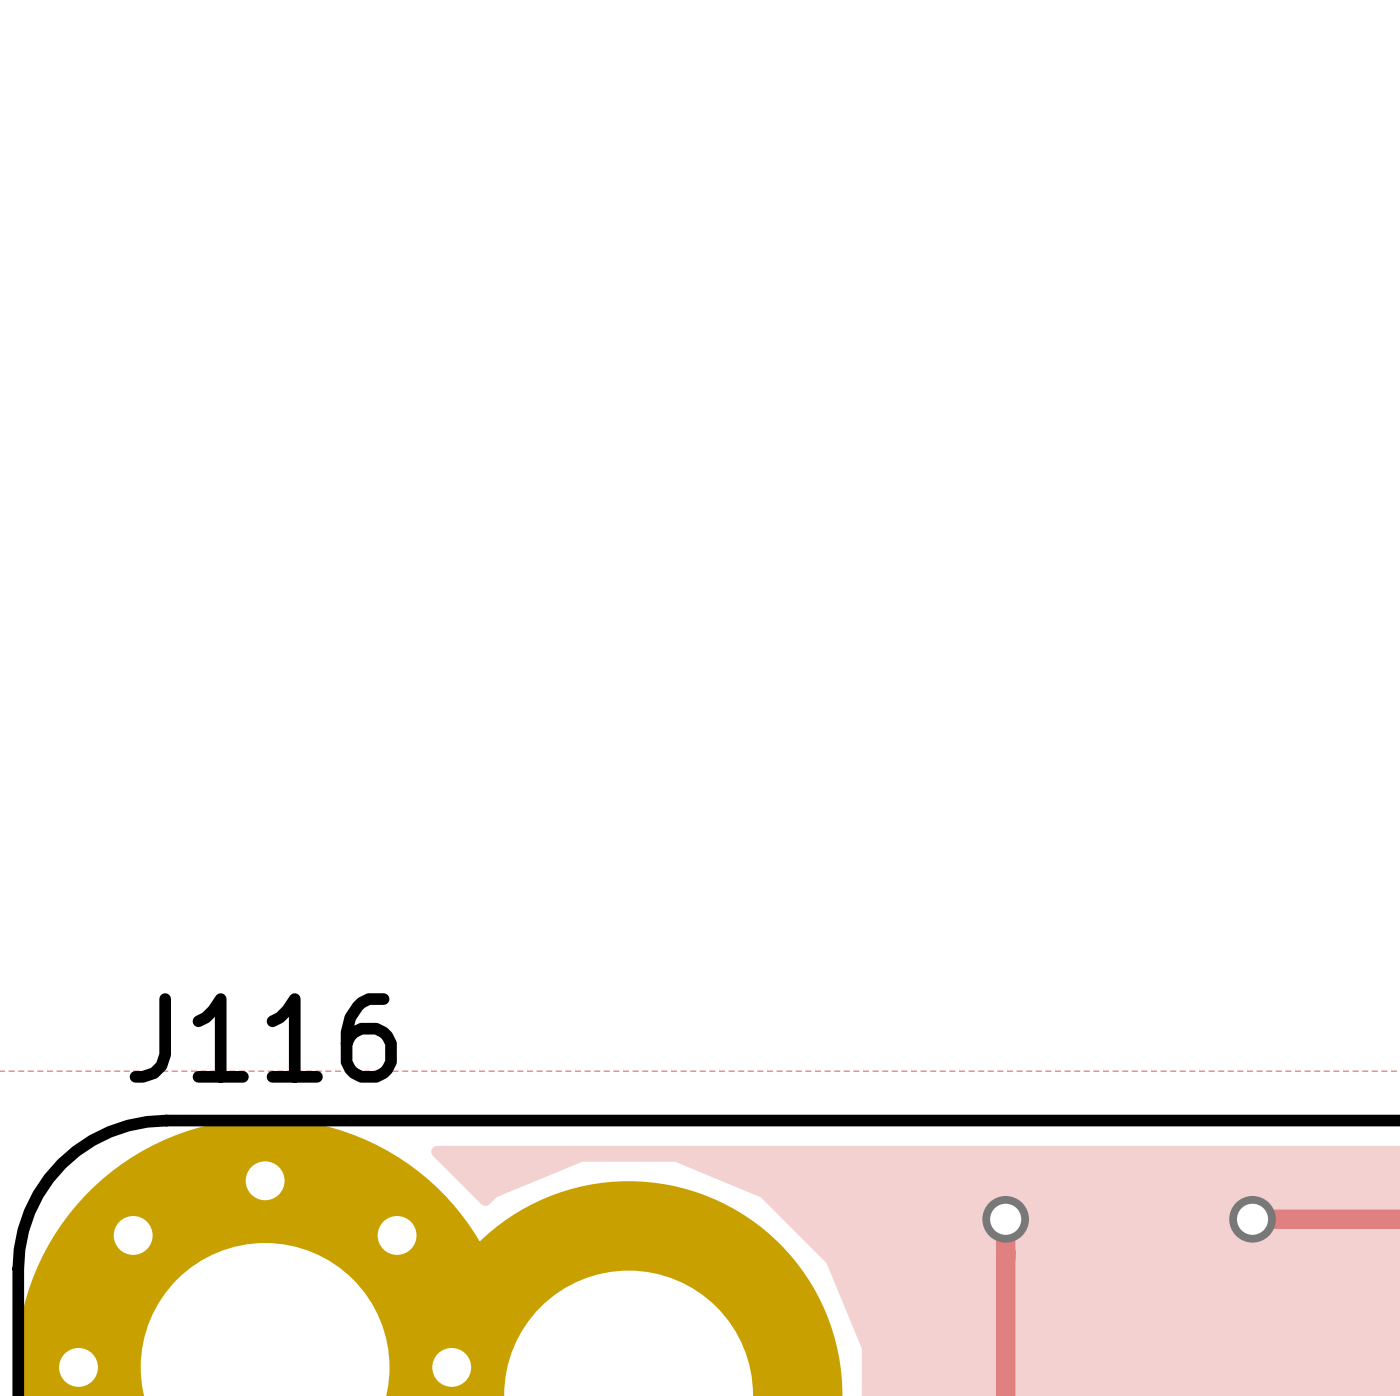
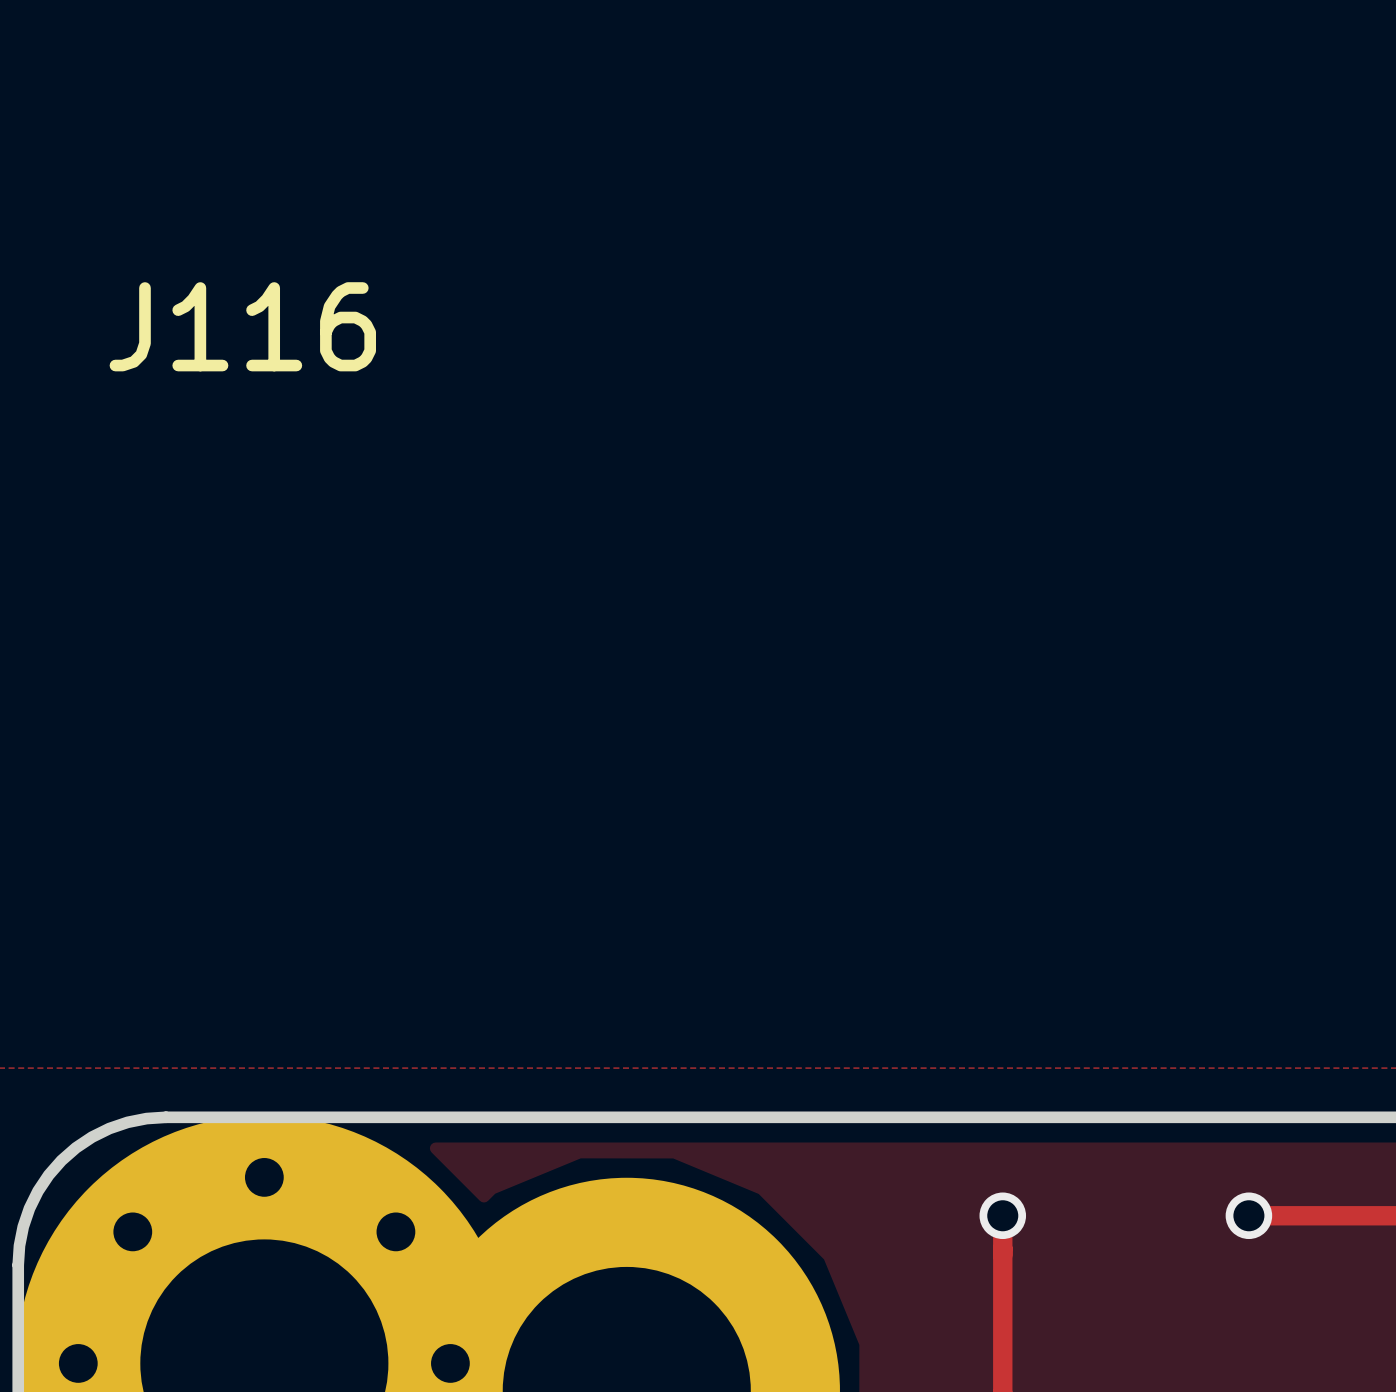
J116 name position: J116 (263, 1037) -> J116 (242, 326)

